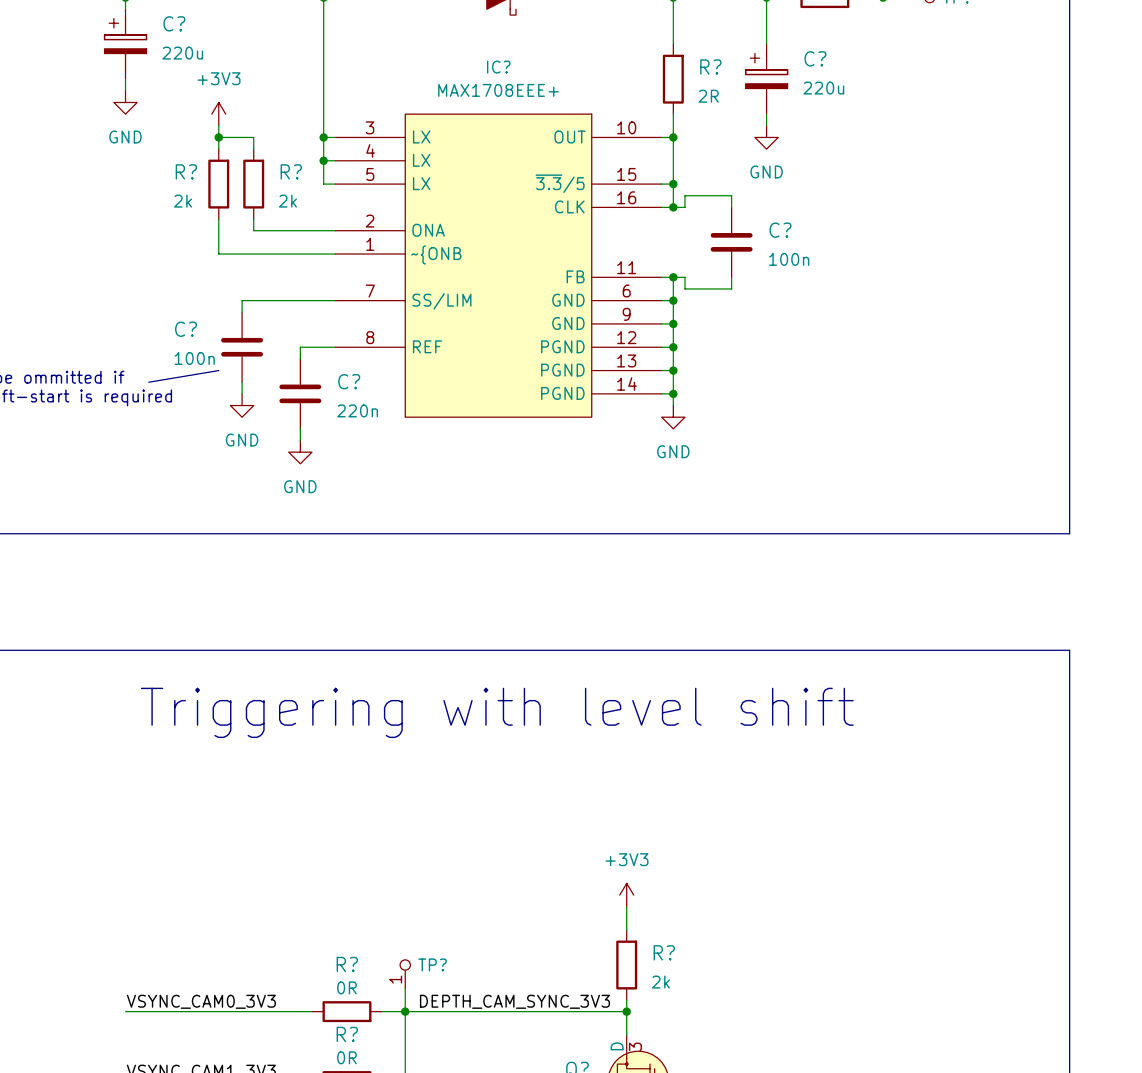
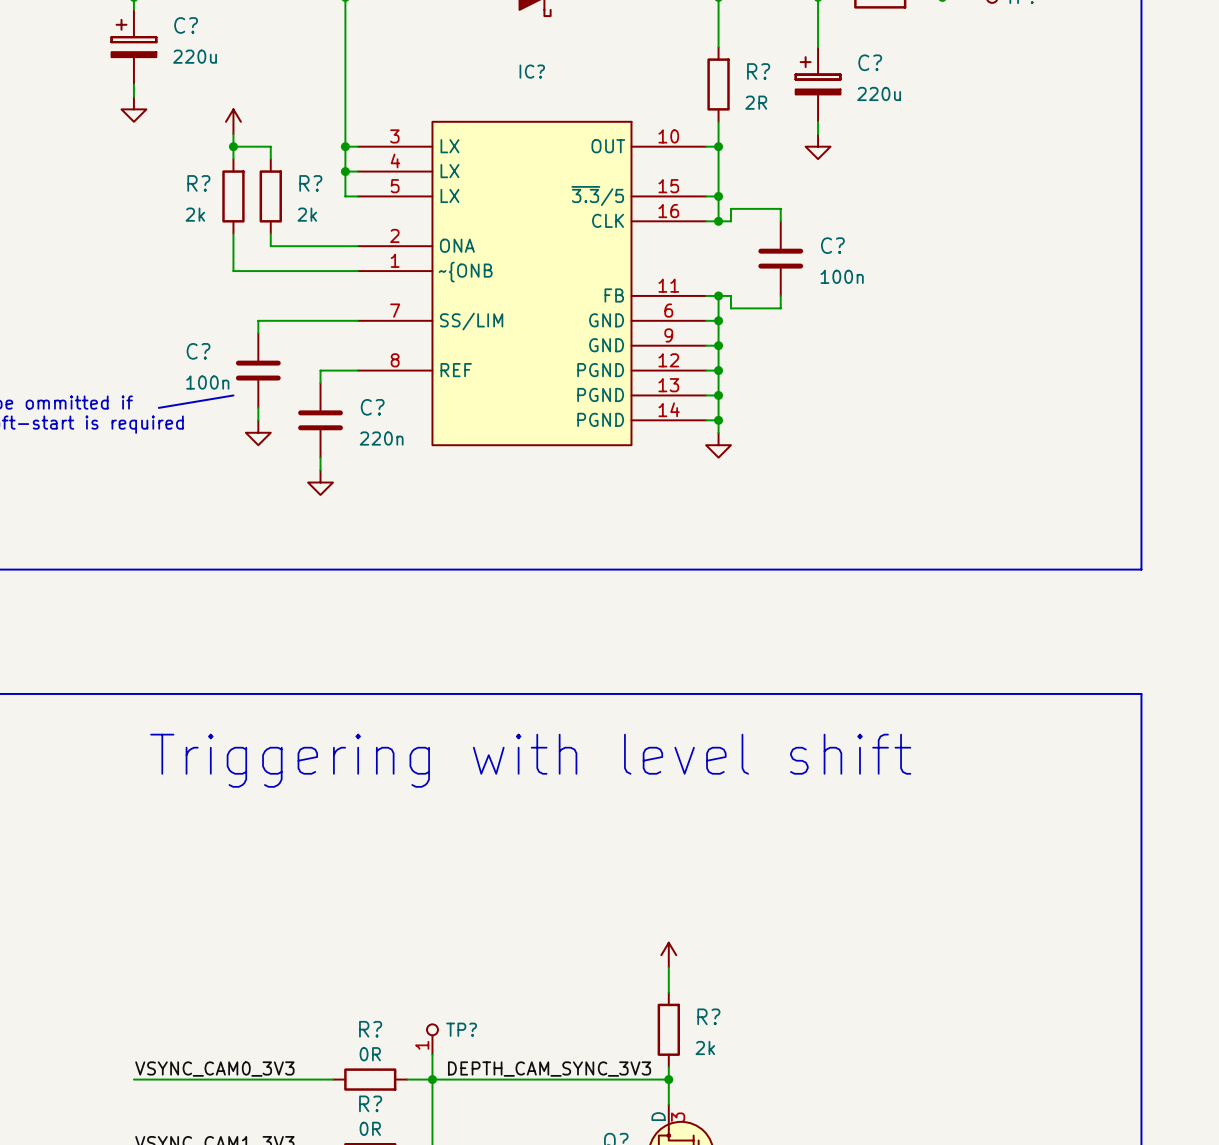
power symbol text: +3V3 (219, 78) -> none
IC? value: MAX1708EEE+ (498, 90) -> none
power symbol text: GND (125, 137) -> none
power symbol text: GND (766, 171) -> none
power symbol text: GND (242, 440) -> none
power symbol text: GND (673, 451) -> none
power symbol text: GND (300, 486) -> none
power symbol text: +3V3 (626, 859) -> none

